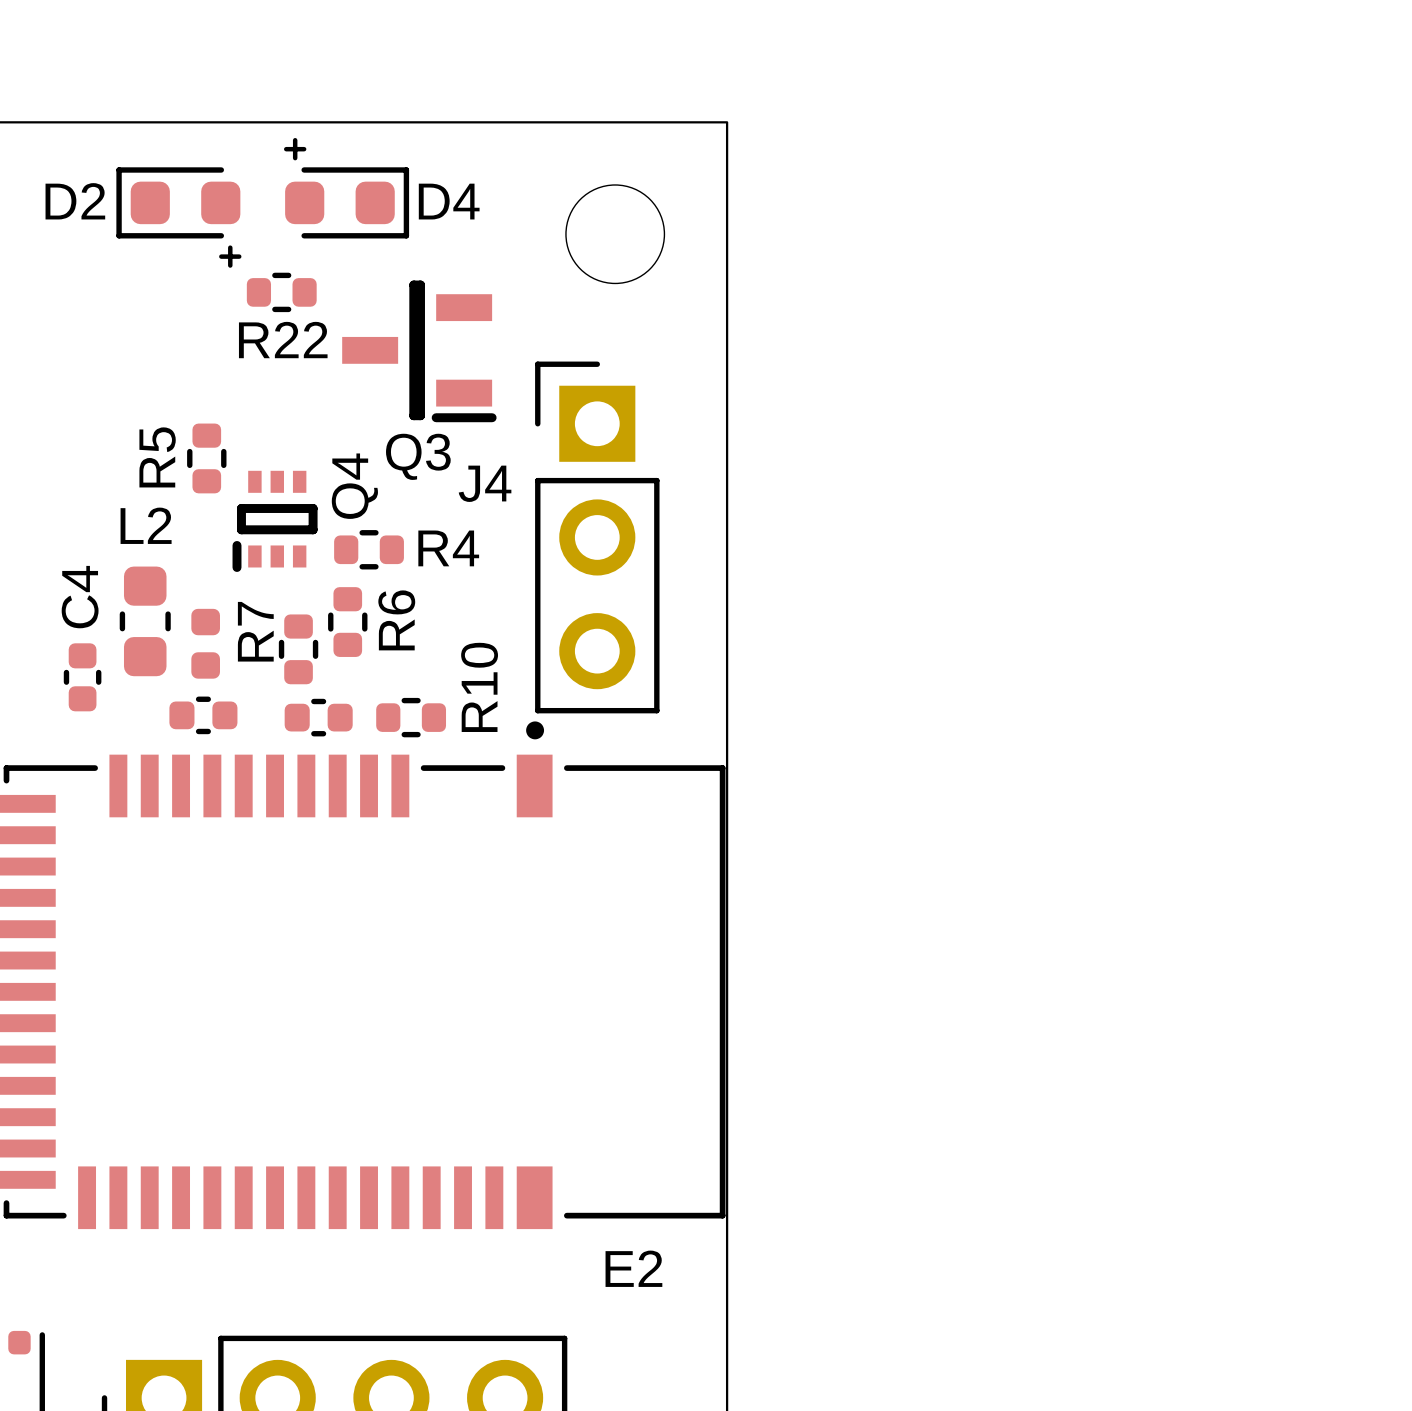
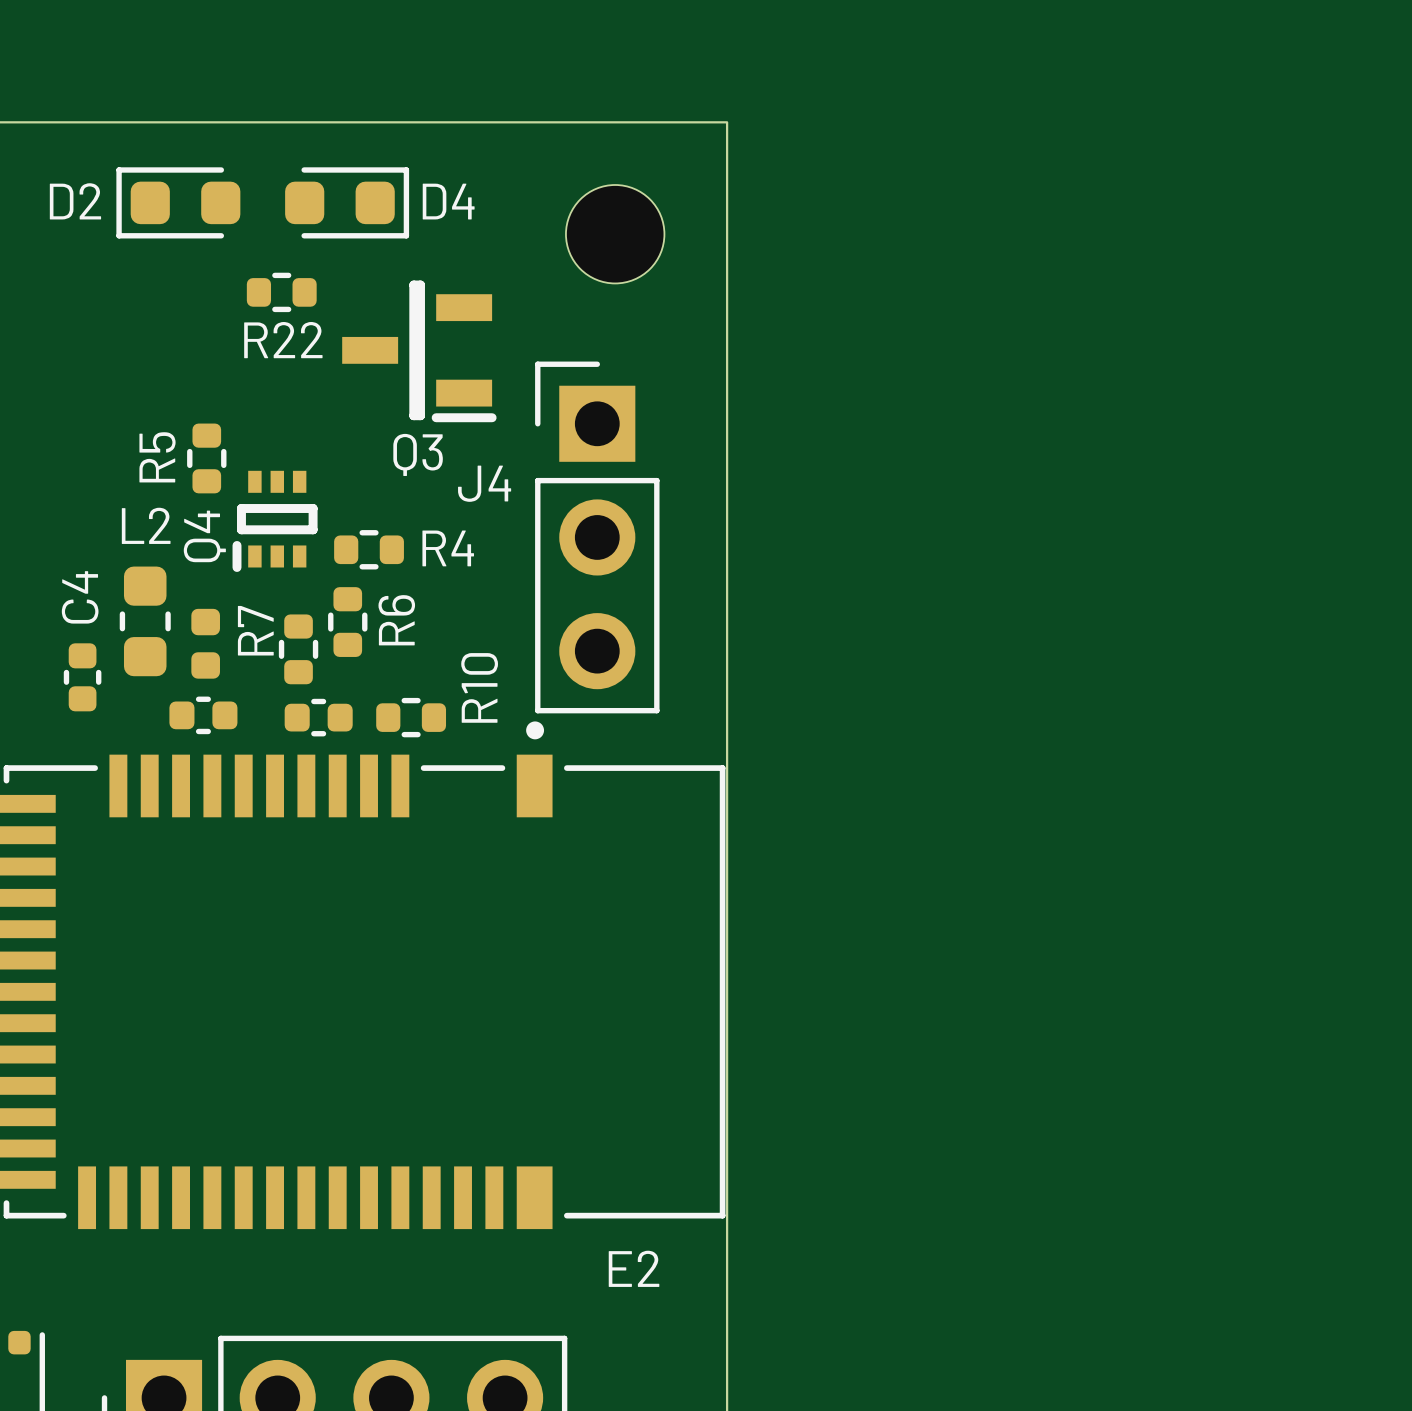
D4 footprint: [283, 137, 410, 239] -> [285, 167, 410, 239]
D2 footprint: [116, 167, 242, 268] -> [116, 167, 241, 239]
Q4 name position: Q4 (354, 486) -> Q4 (204, 536)

